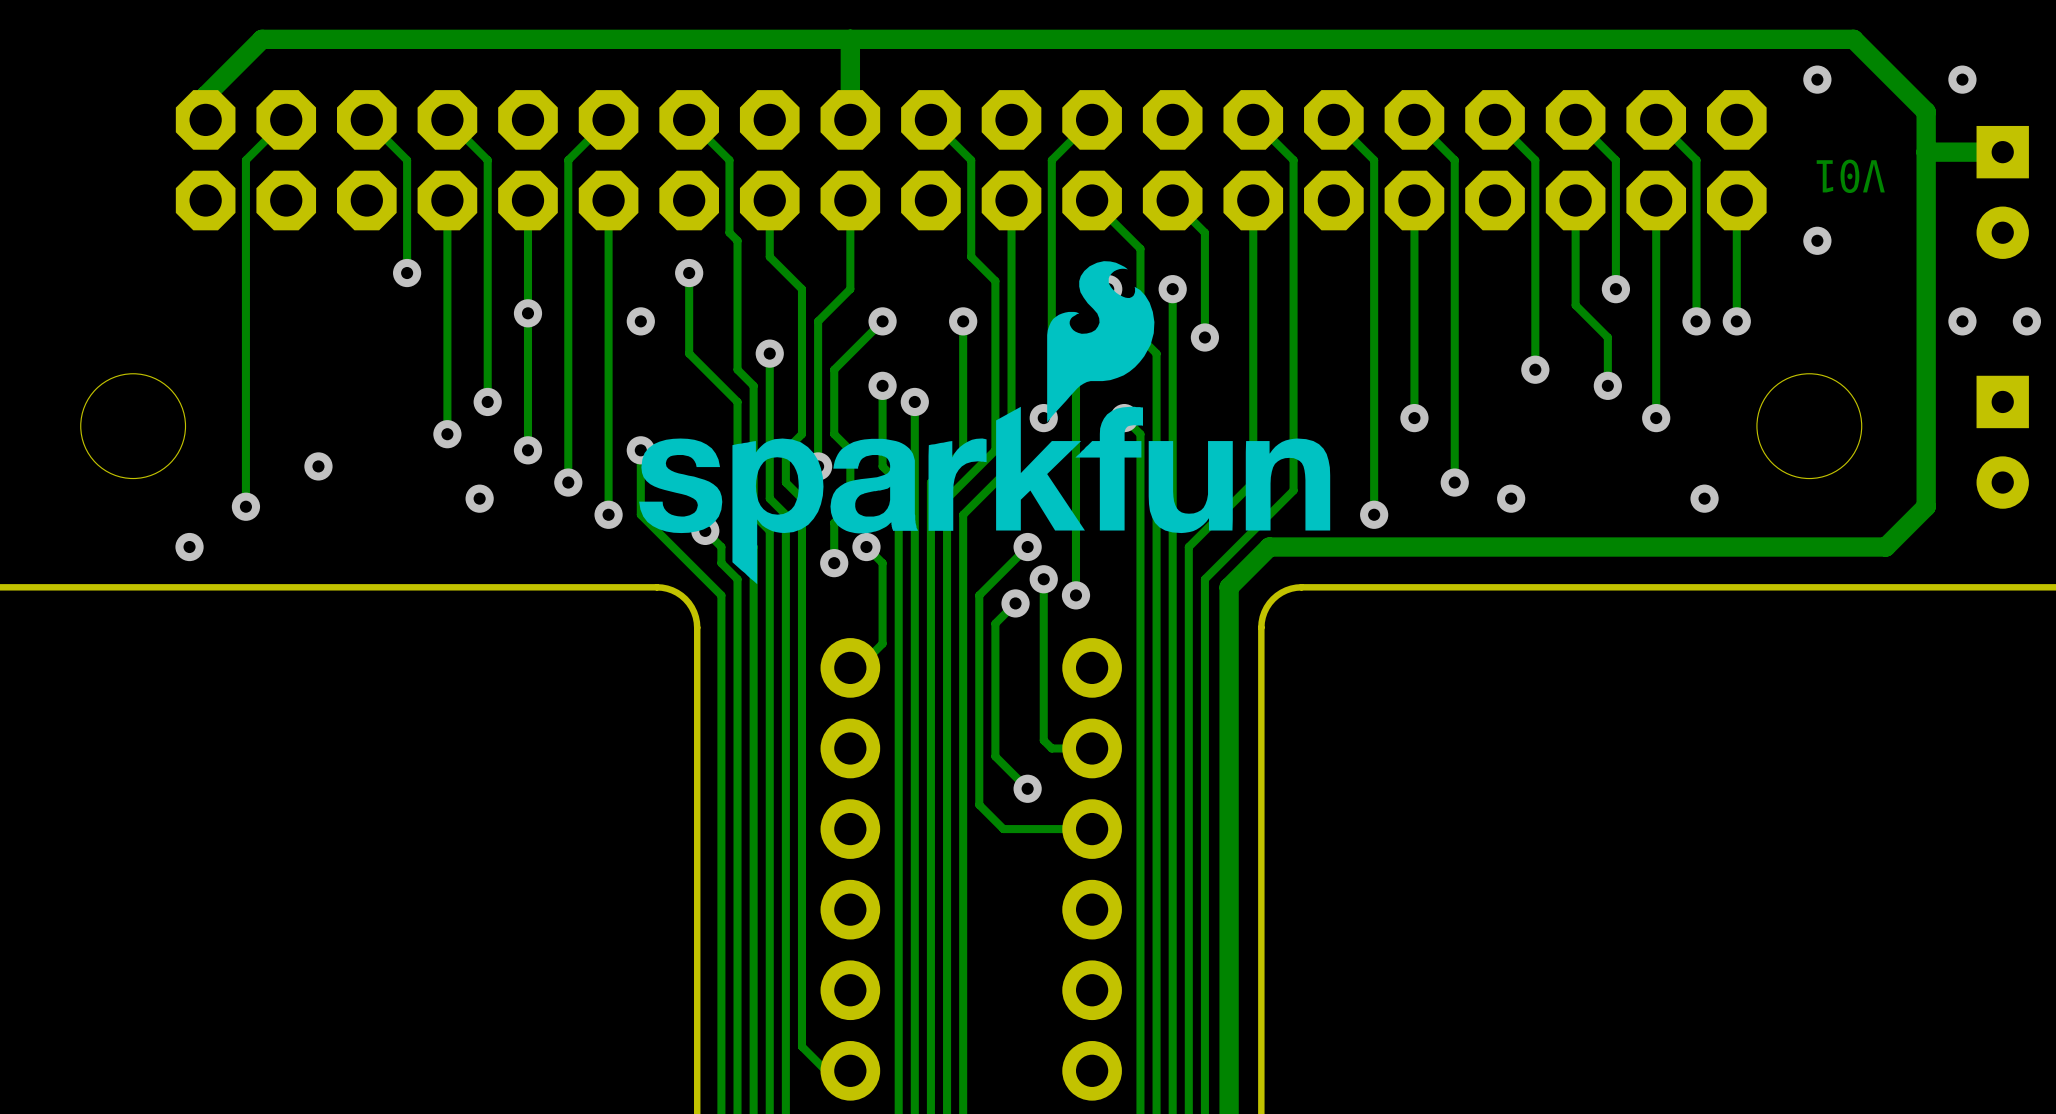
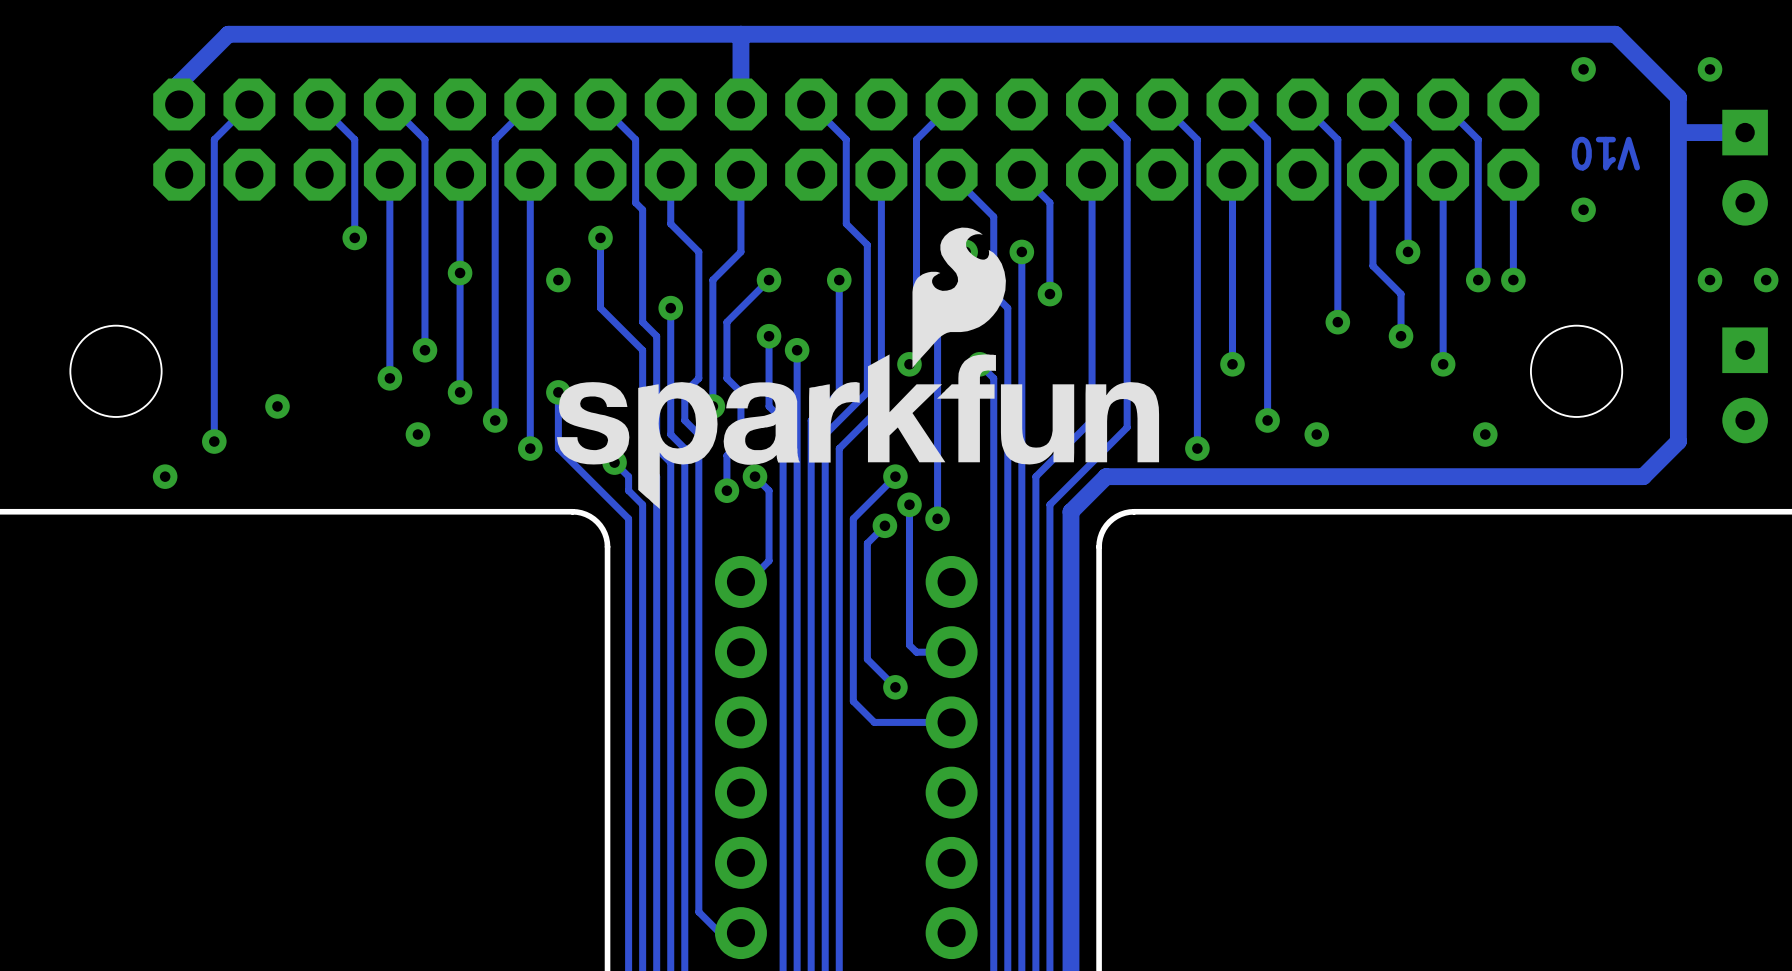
text: V01 (1850, 176) -> V10 (1605, 153)

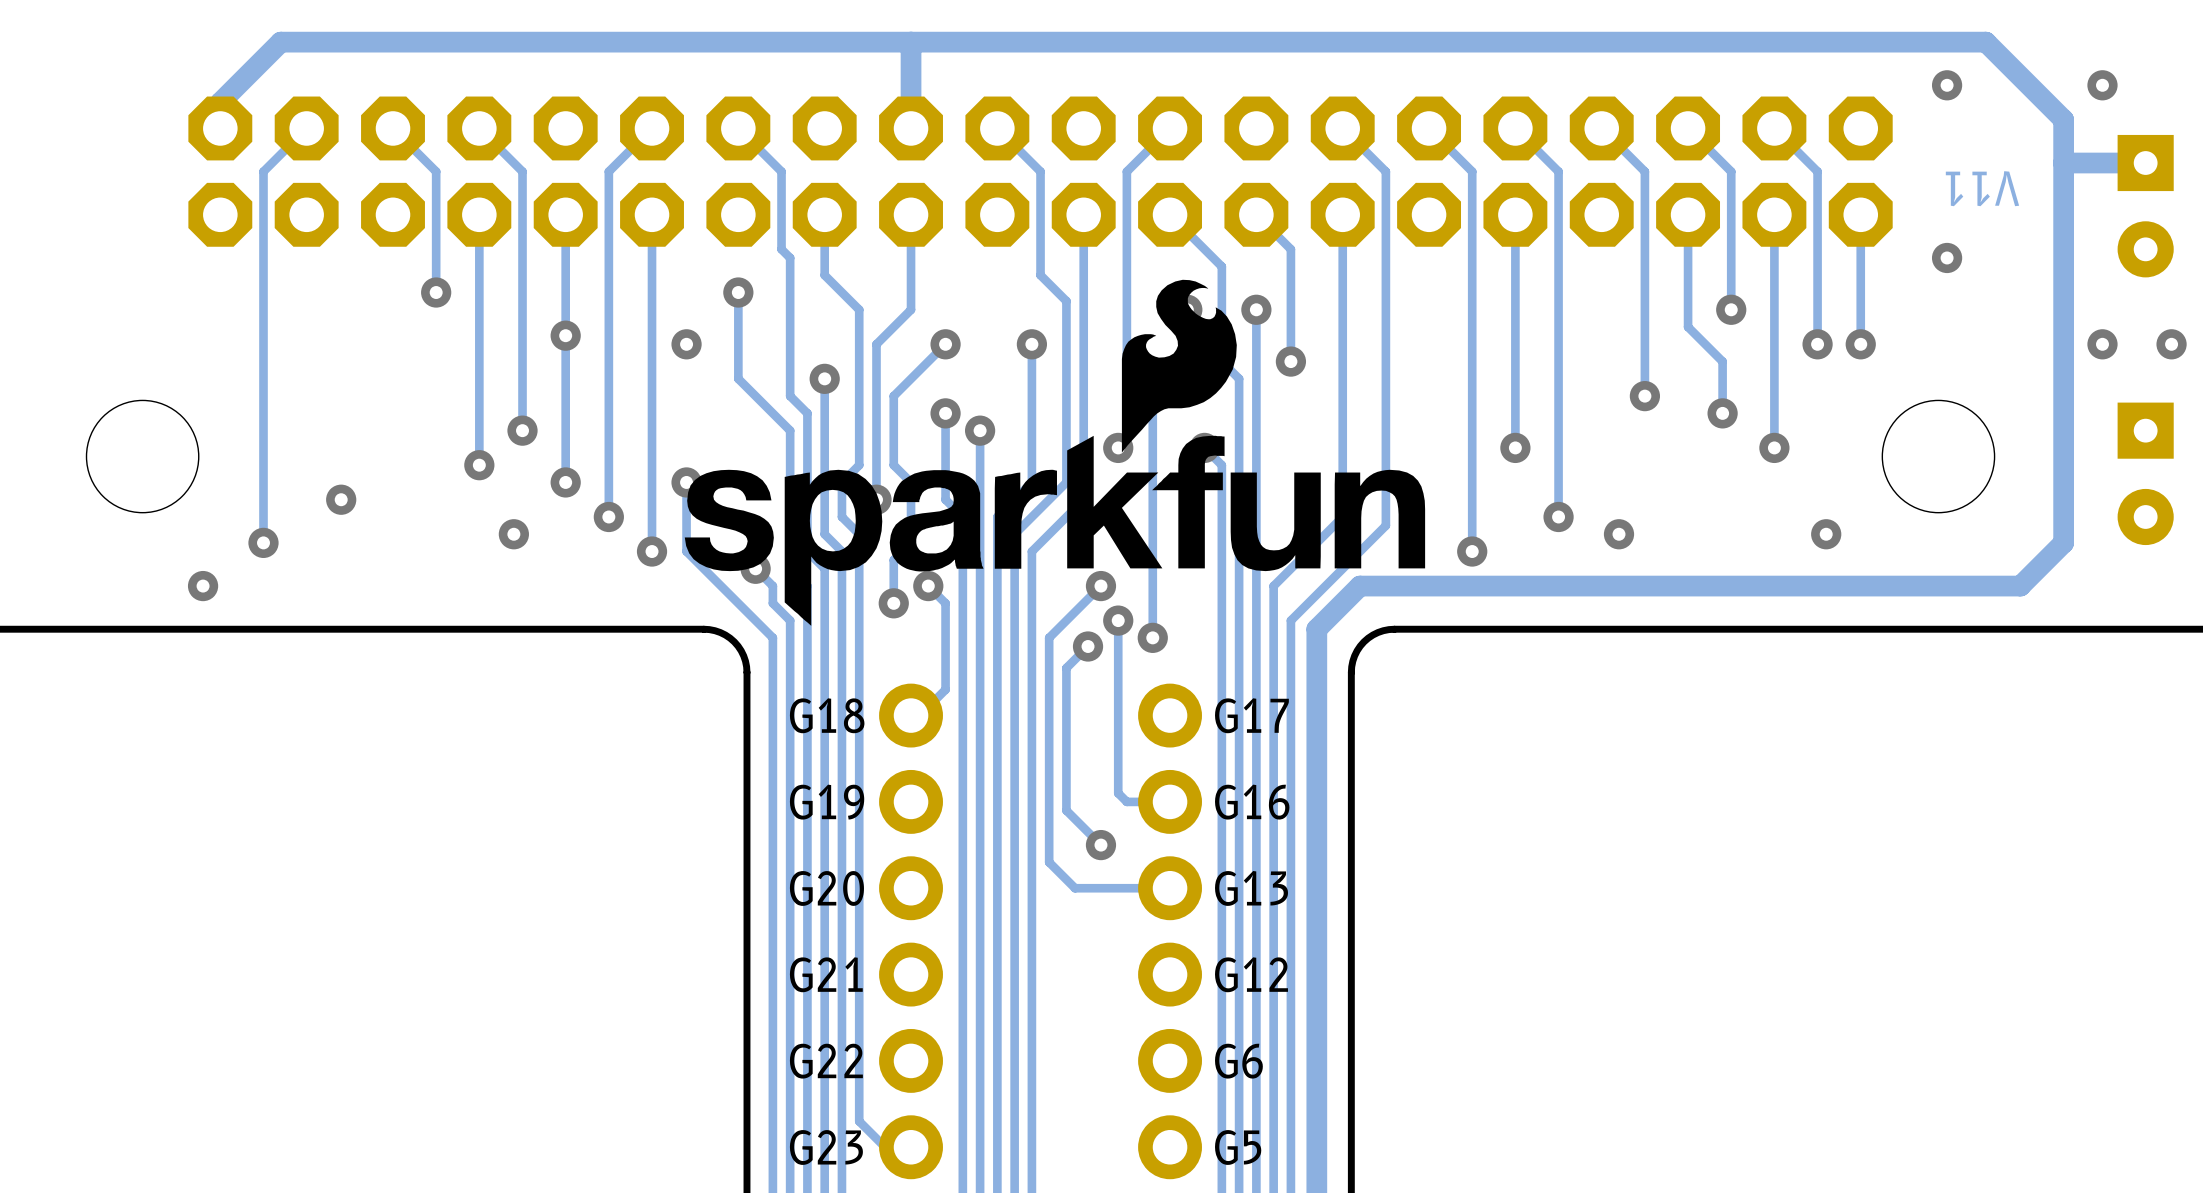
text: V10 (1605, 153) -> V11 (1982, 188)
text: none -> G18 (827, 715)
text: none -> G17 (1251, 715)
text: none -> G19 (827, 802)
text: none -> G16 (1252, 802)
text: none -> G20 (826, 888)
text: none -> G13 (1251, 888)
text: none -> G21 (826, 974)
text: none -> G12 (1251, 974)
text: none -> G22 (826, 1061)
text: none -> G6 (1238, 1061)
text: none -> G23 (826, 1147)
text: none -> G5 (1238, 1147)

